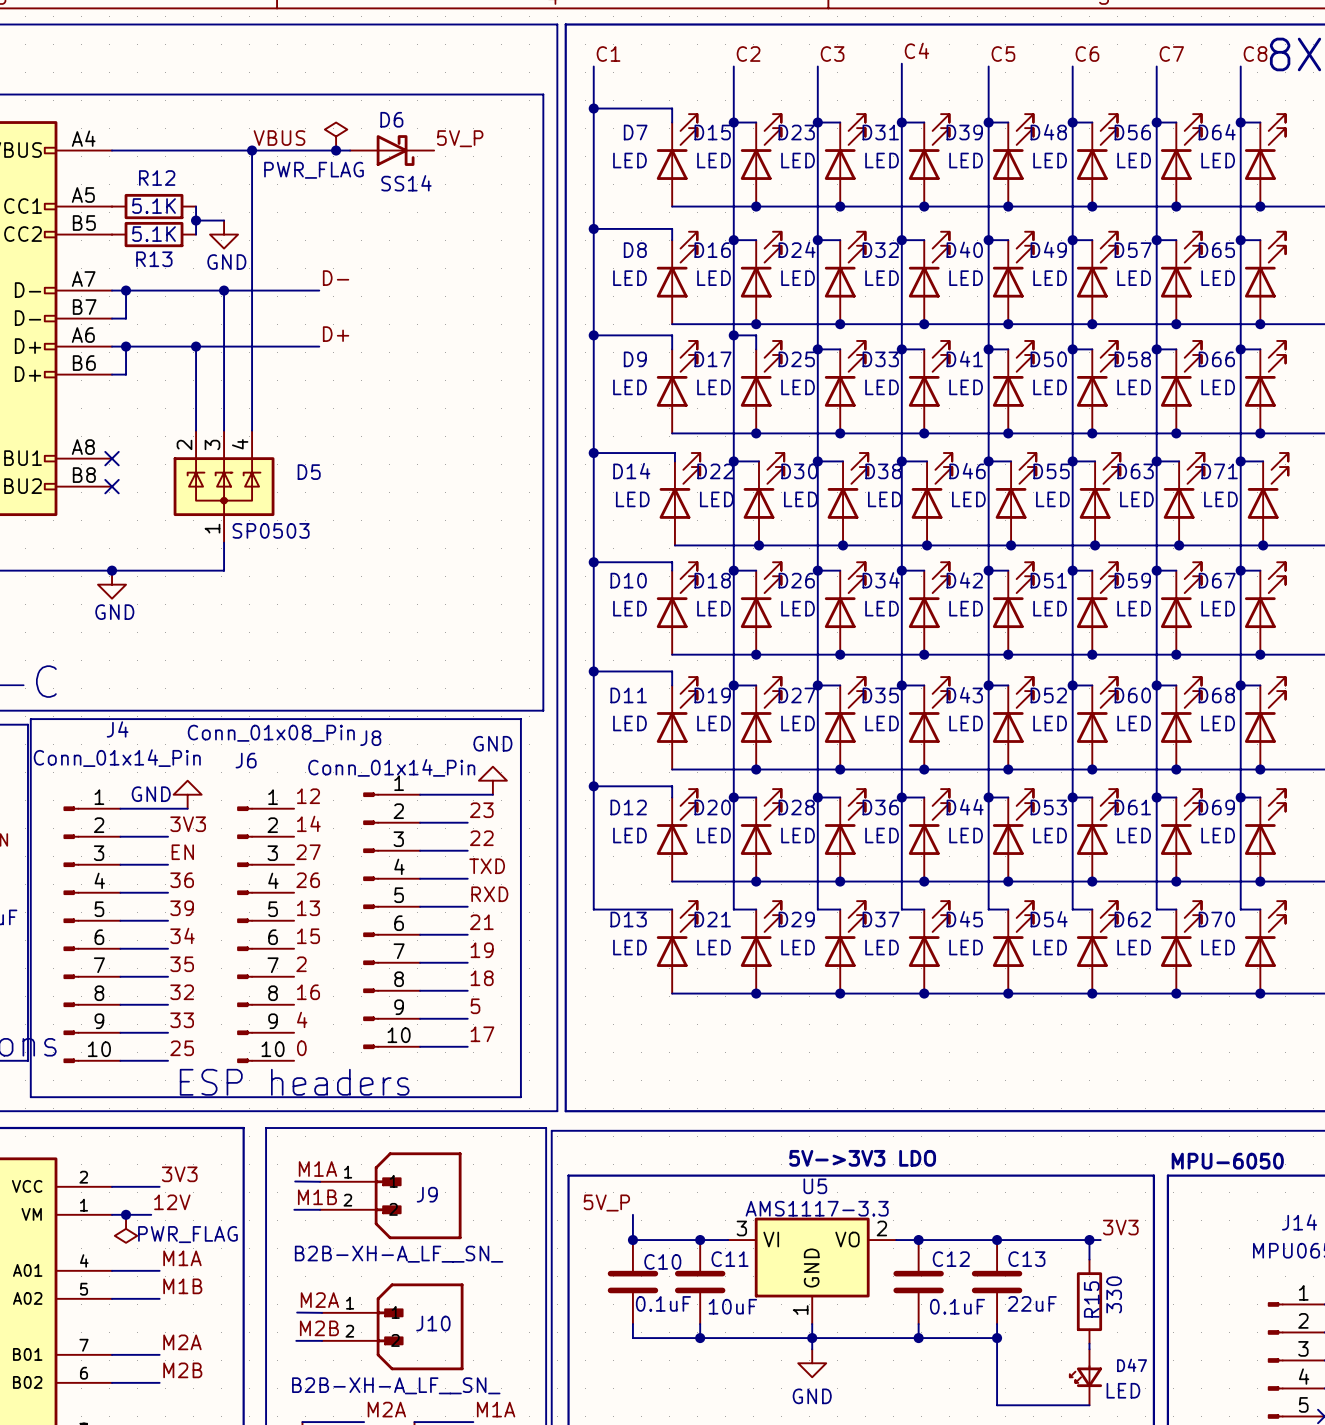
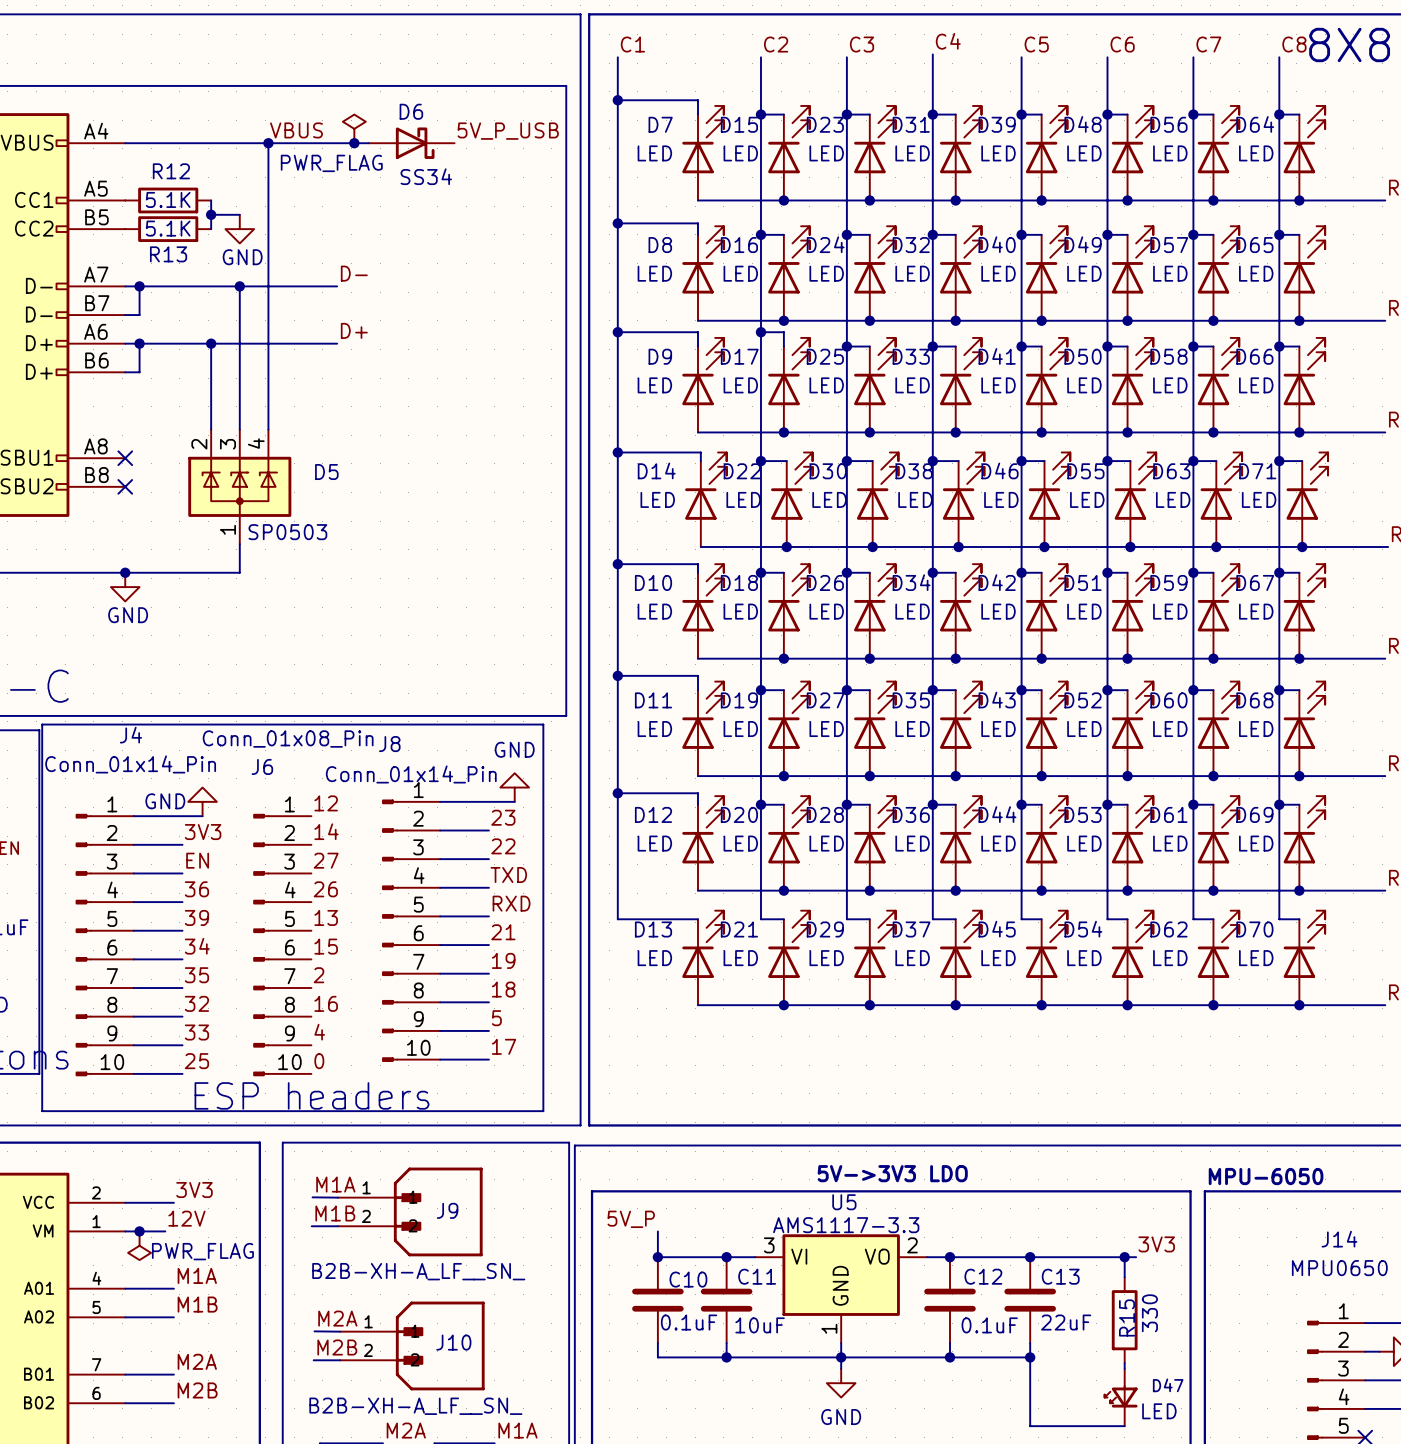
label: 5V_P (460, 138) -> 5V_P_USB (508, 131)
D6 value: SS14 (406, 183) -> SS34 (426, 176)

